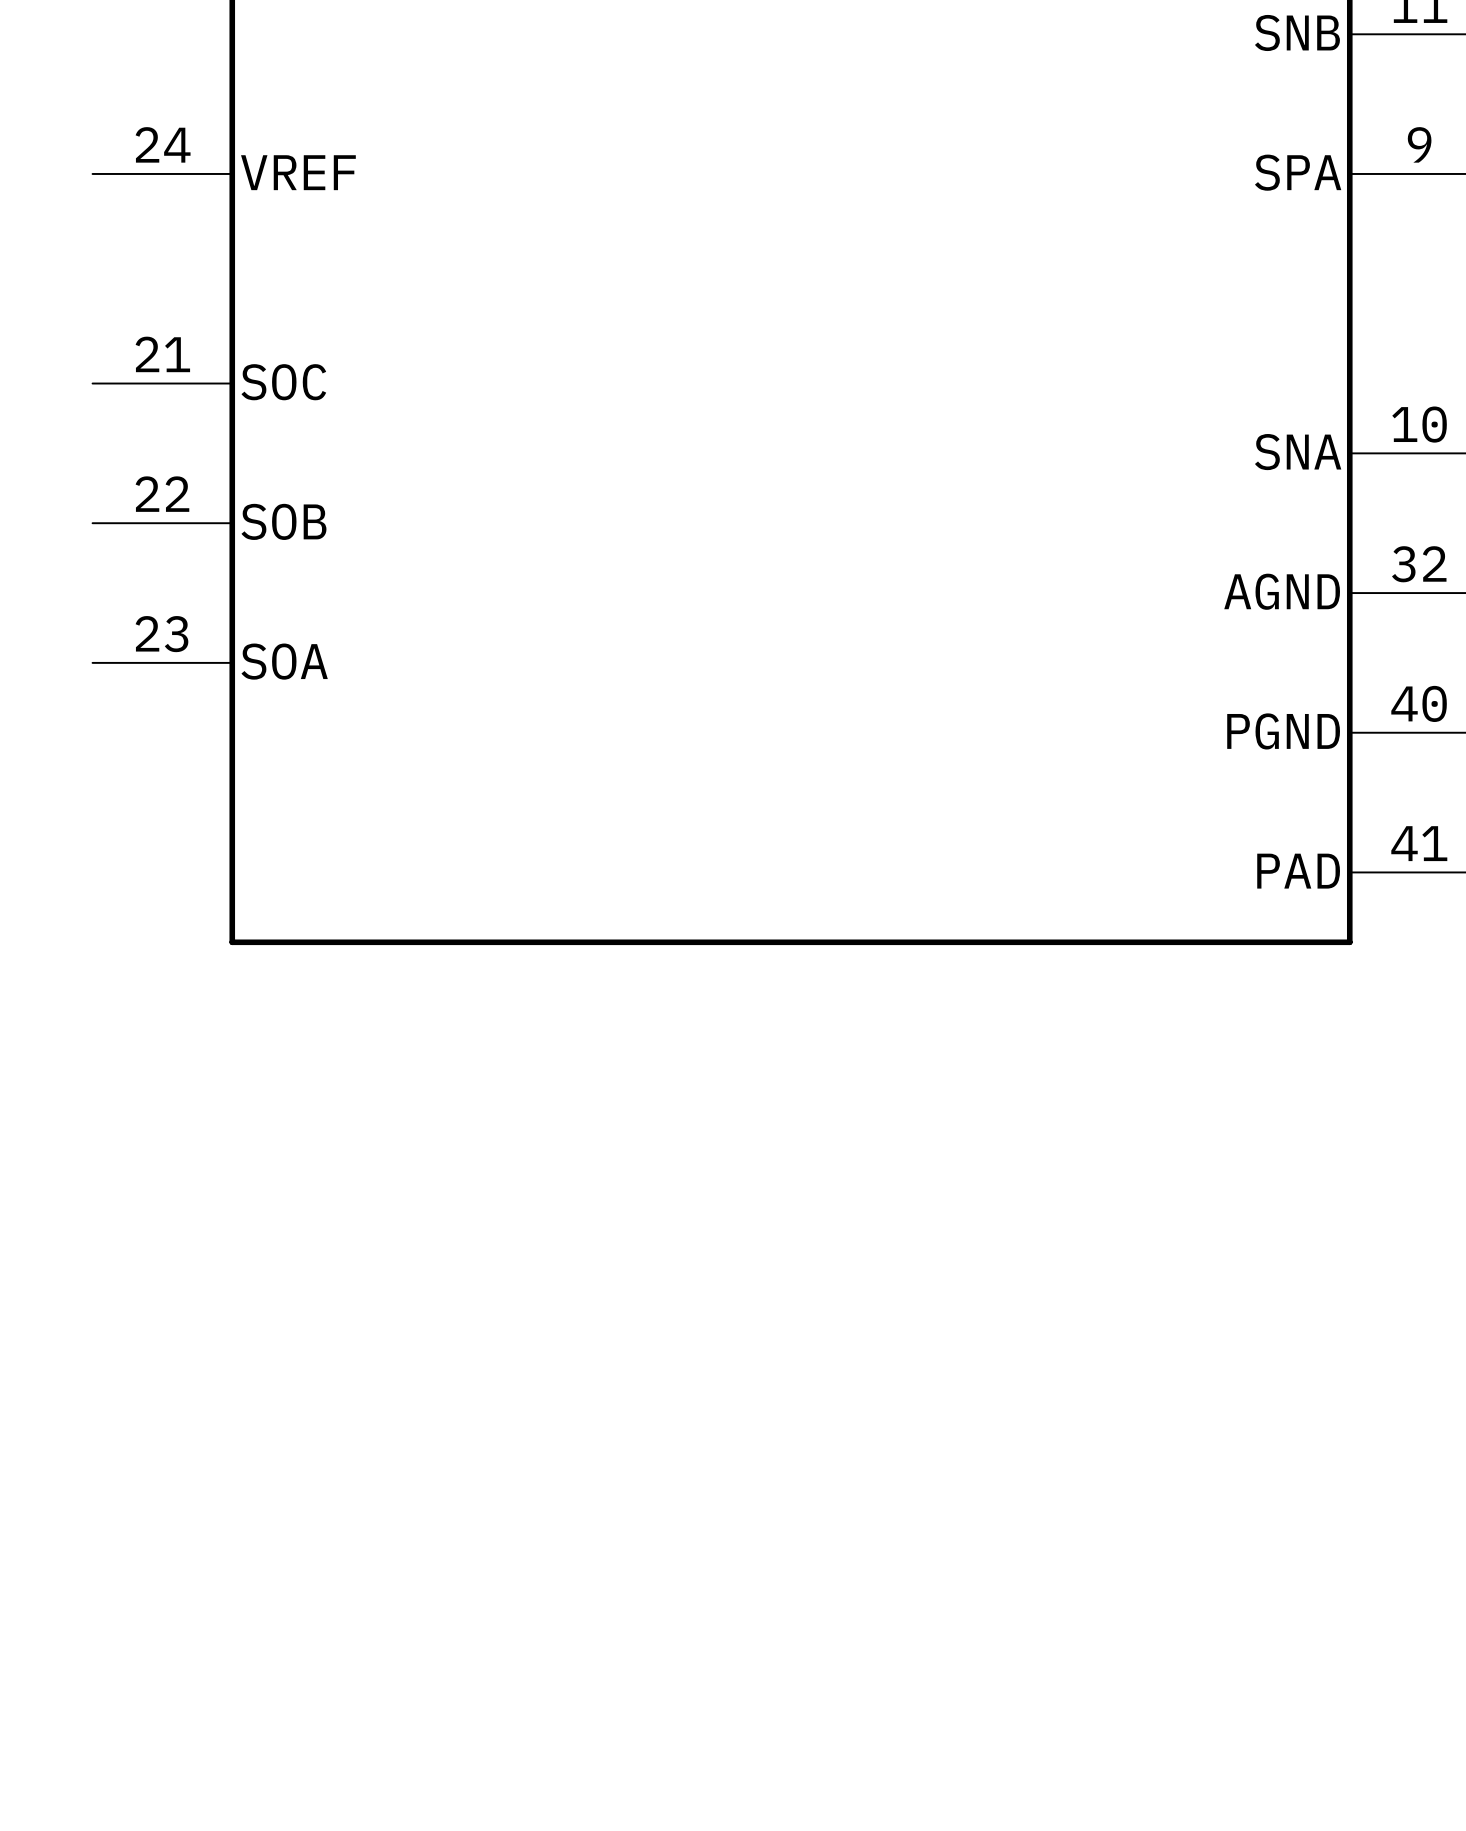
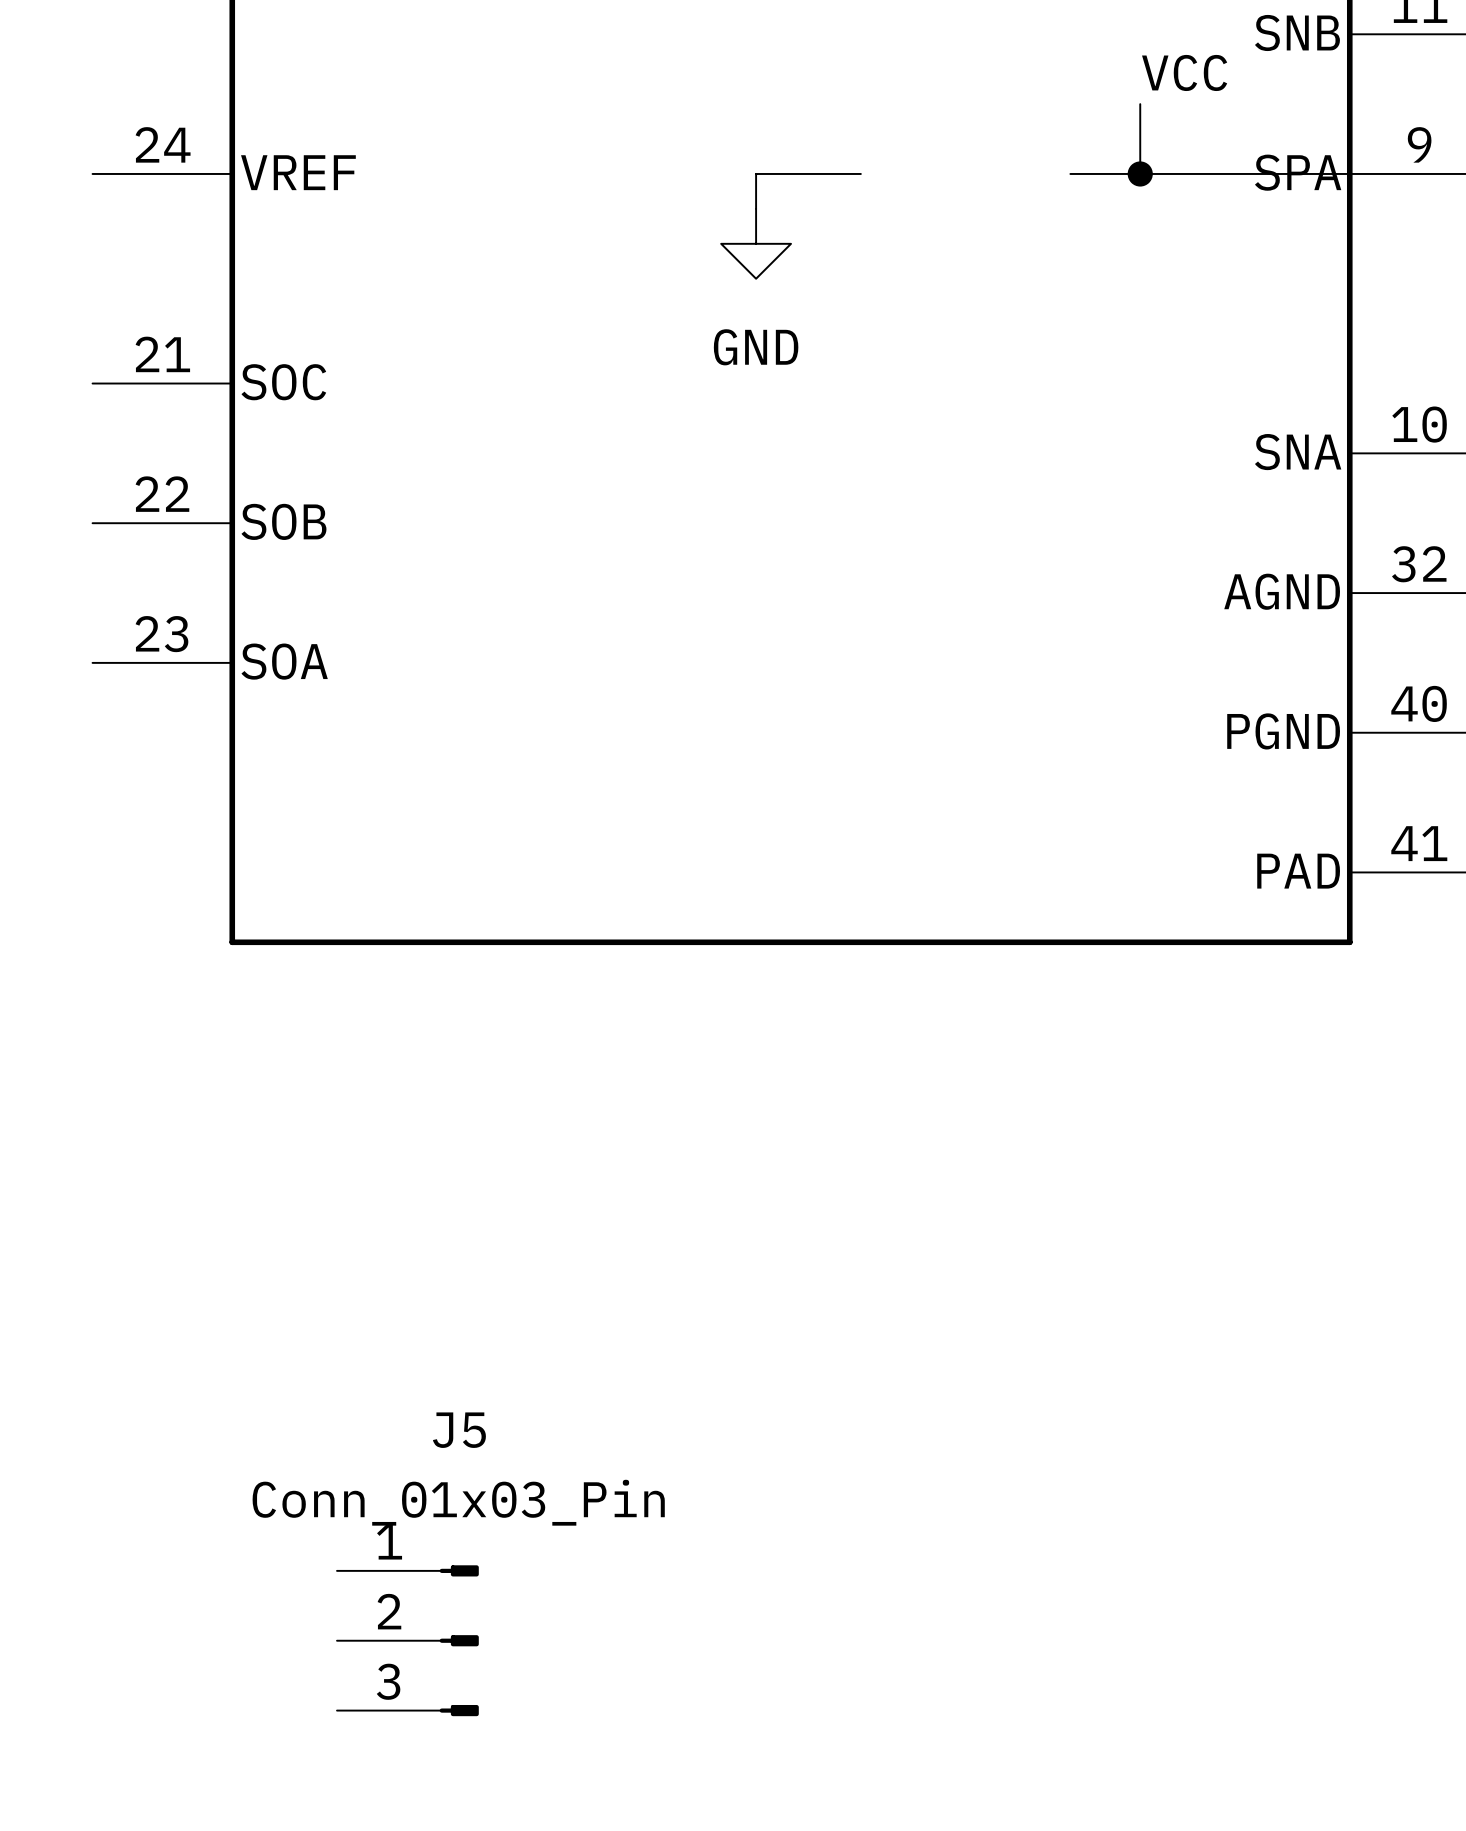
label: none -> VCC (1184, 72)
wire: none -> (1140, 104) (1140, 173)
wire: none -> (860, 173) (756, 173) (756, 208)
wire: none -> (1070, 173) (1349, 173)
junction: none -> (1140, 173)
power symbol: none -> GND (756, 243)
J5: none -> Conn_01x03_Pin (407, 1640)

